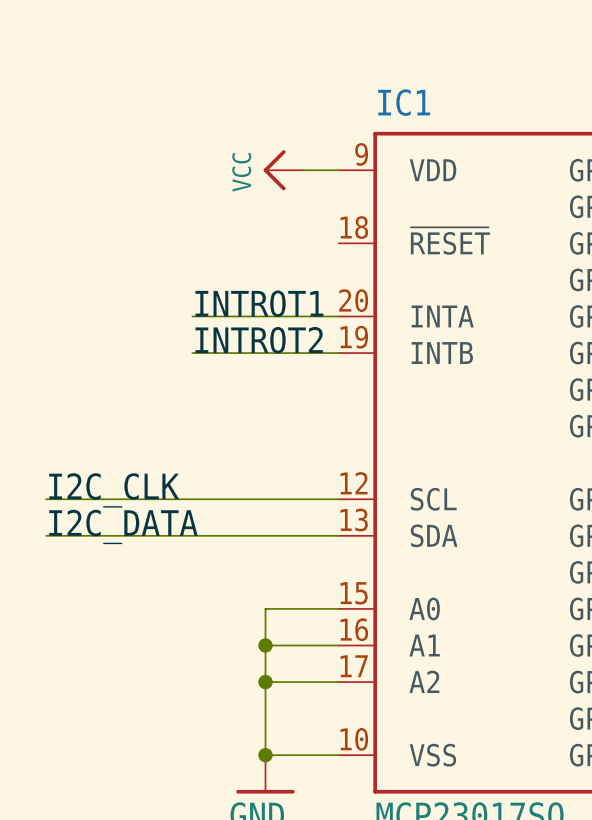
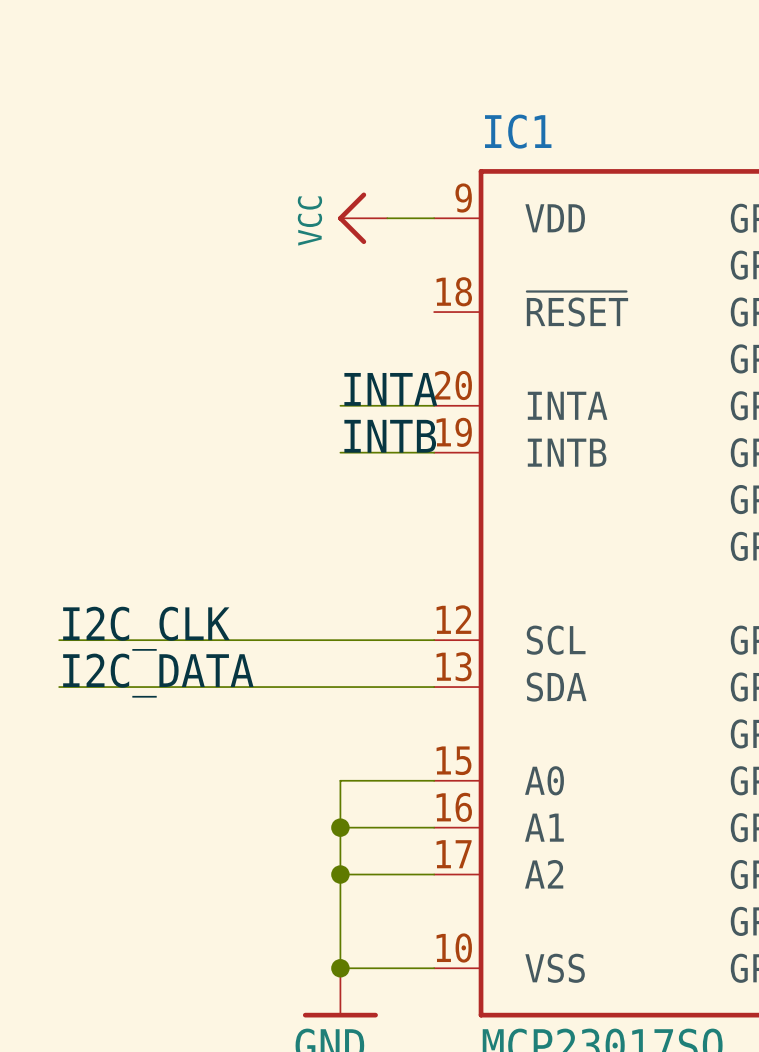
label: INTROT1 (259, 303) -> none
label: none -> INTA (390, 389)
wire: (192, 316) (265, 316) -> none
label: INTROT2 (259, 340) -> none
label: none -> INTB (390, 436)
wire: (192, 353) (265, 353) -> none

